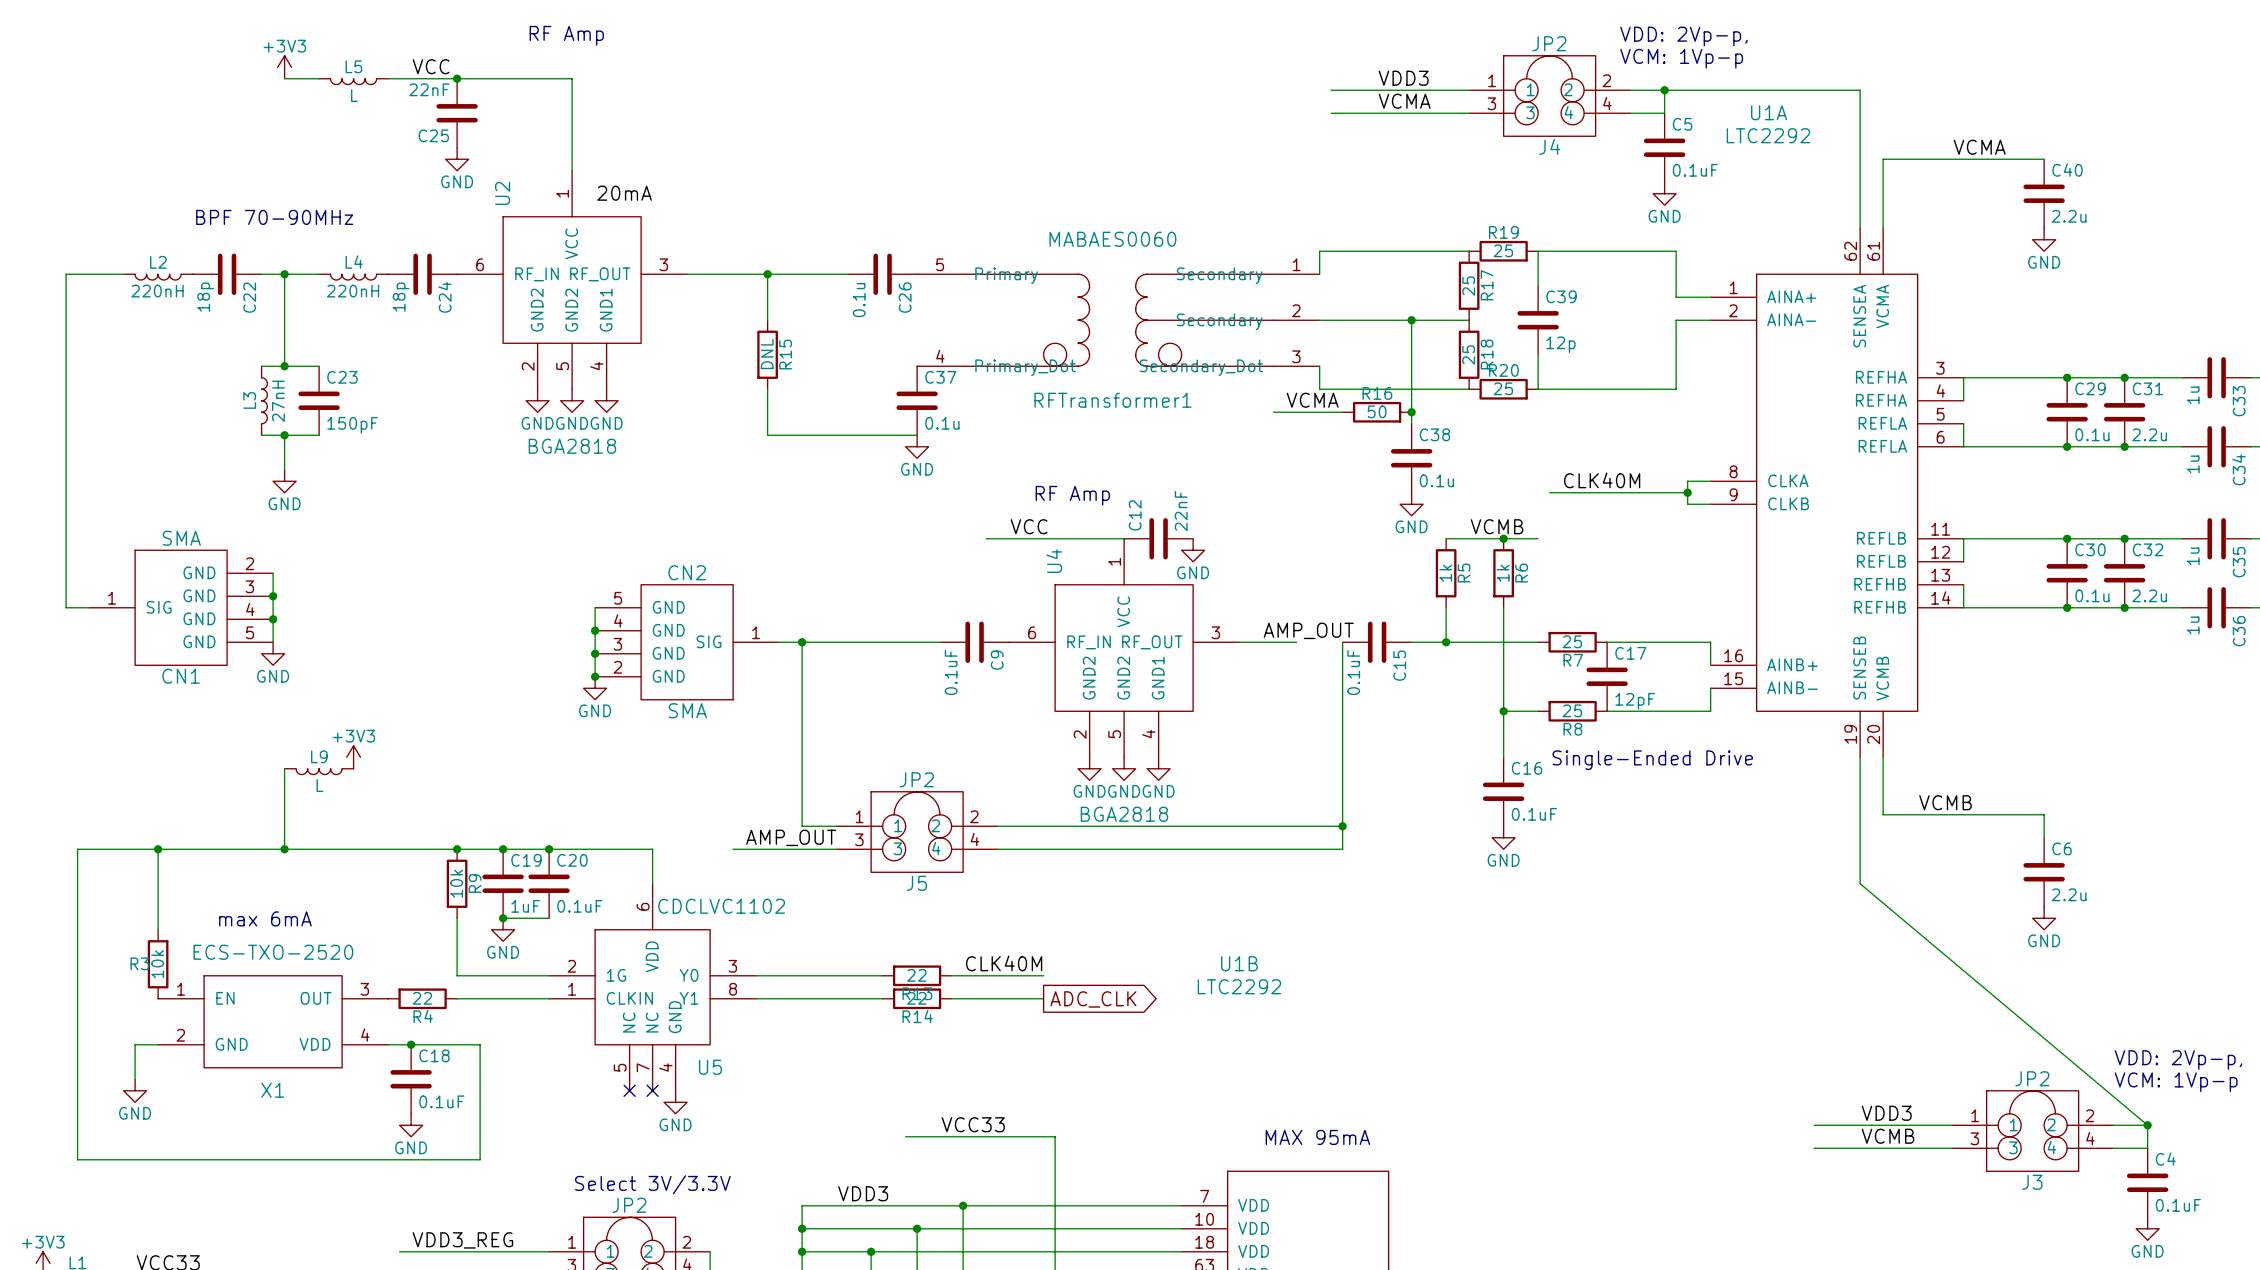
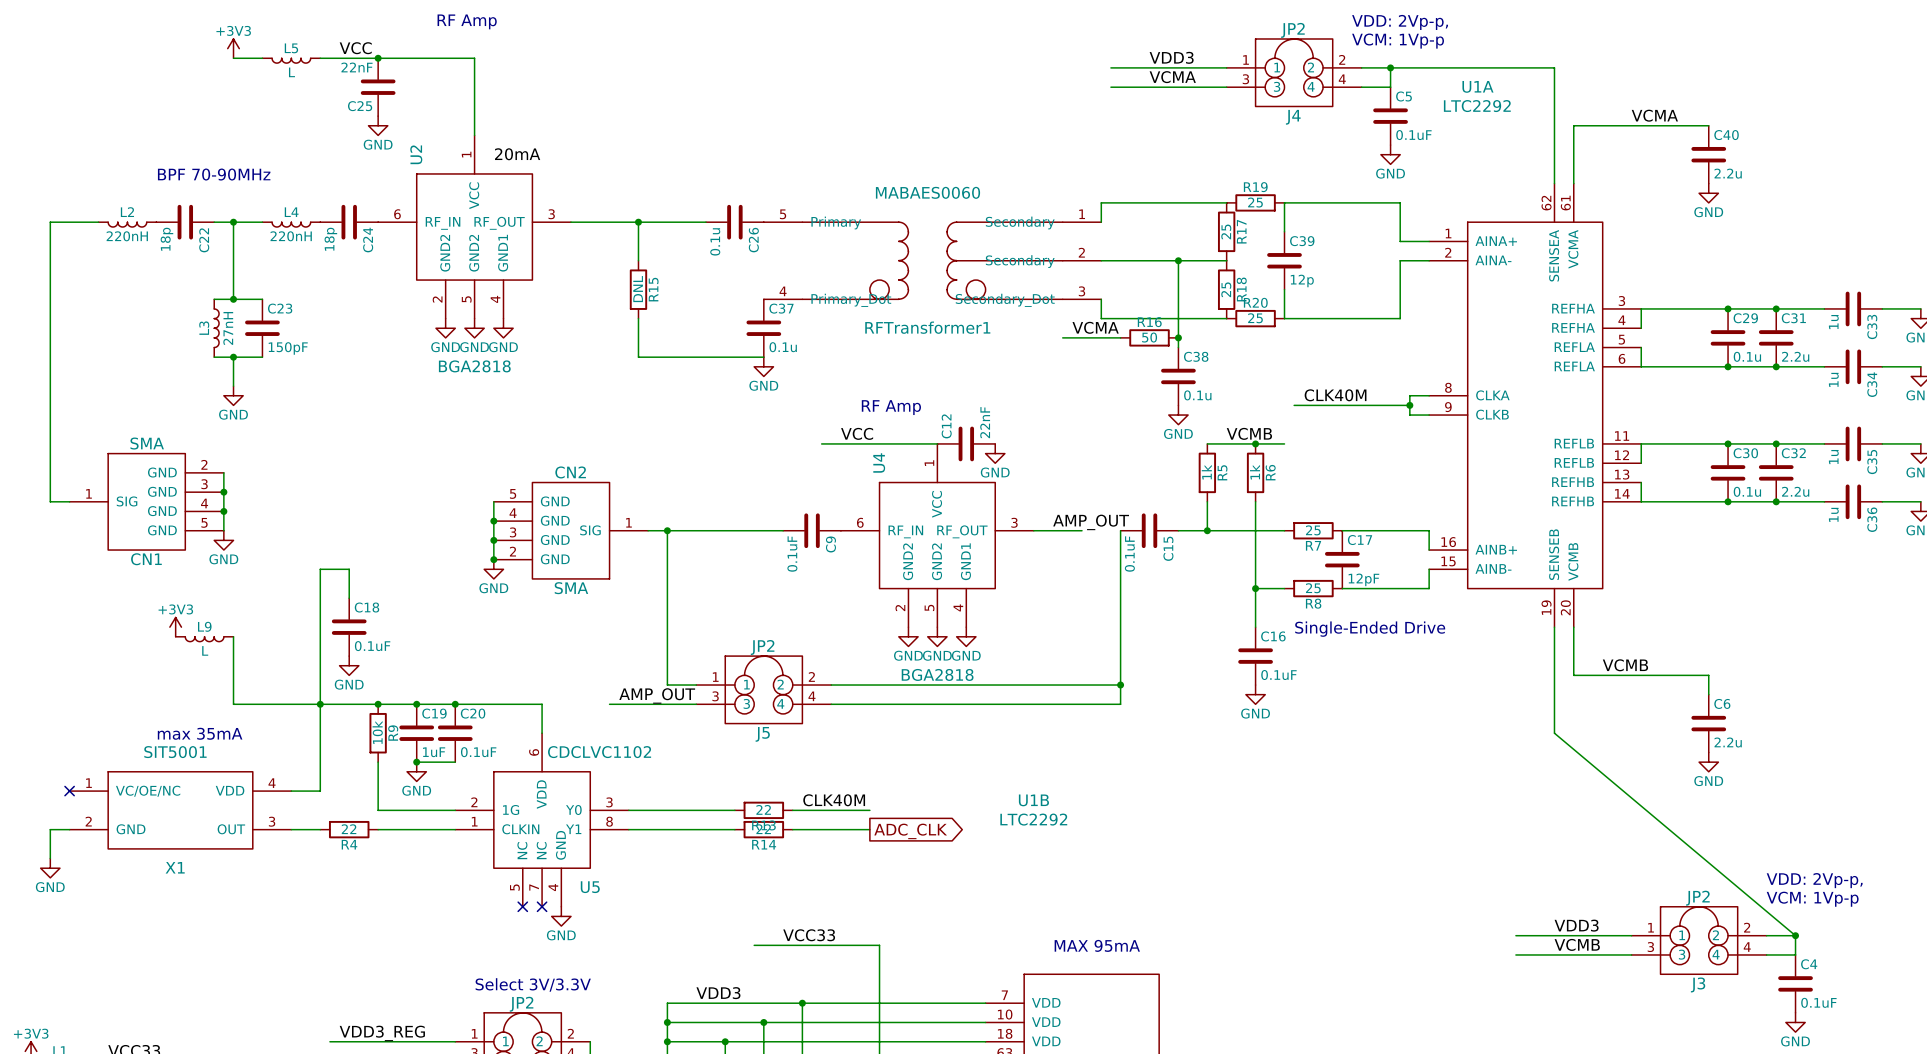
wire: none -> (349, 598) (349, 569) (320, 569) (320, 791) (291, 791)
power symbol position: +3V3 (353, 757) -> +3V3 (175, 627)
L9 position: (319, 771) -> (204, 639)
power symbol: none -> GND (349, 665)
wire: (158, 849) (158, 929) -> none
junction: (158, 849) -> none
wire: (284, 849) (77, 849) (77, 1159) (480, 1159) (480, 1044) (388, 1044) -> none
junction: (284, 849) -> none
junction: none -> (320, 704)
text: none -> max 35mA (200, 733)
text: max 6mA (265, 918) -> none
no-connect mark: none -> (69, 791)
X1 value: ECS-TXO-2520 (273, 952) -> SIT5001 (175, 752)
R3: 10k (158, 964) -> none
X1 symbol: [158, 975, 389, 1068] -> [69, 771, 292, 849]
wire: (158, 1044) (135, 1044) (135, 1079) -> (69, 829) (50, 829) (50, 858)
junction: (411, 1044) -> none
C18 position: (411, 1079) -> (349, 627)
power symbol position: GND (135, 1090) -> GND (50, 868)
power symbol: GND (411, 1125) -> none

